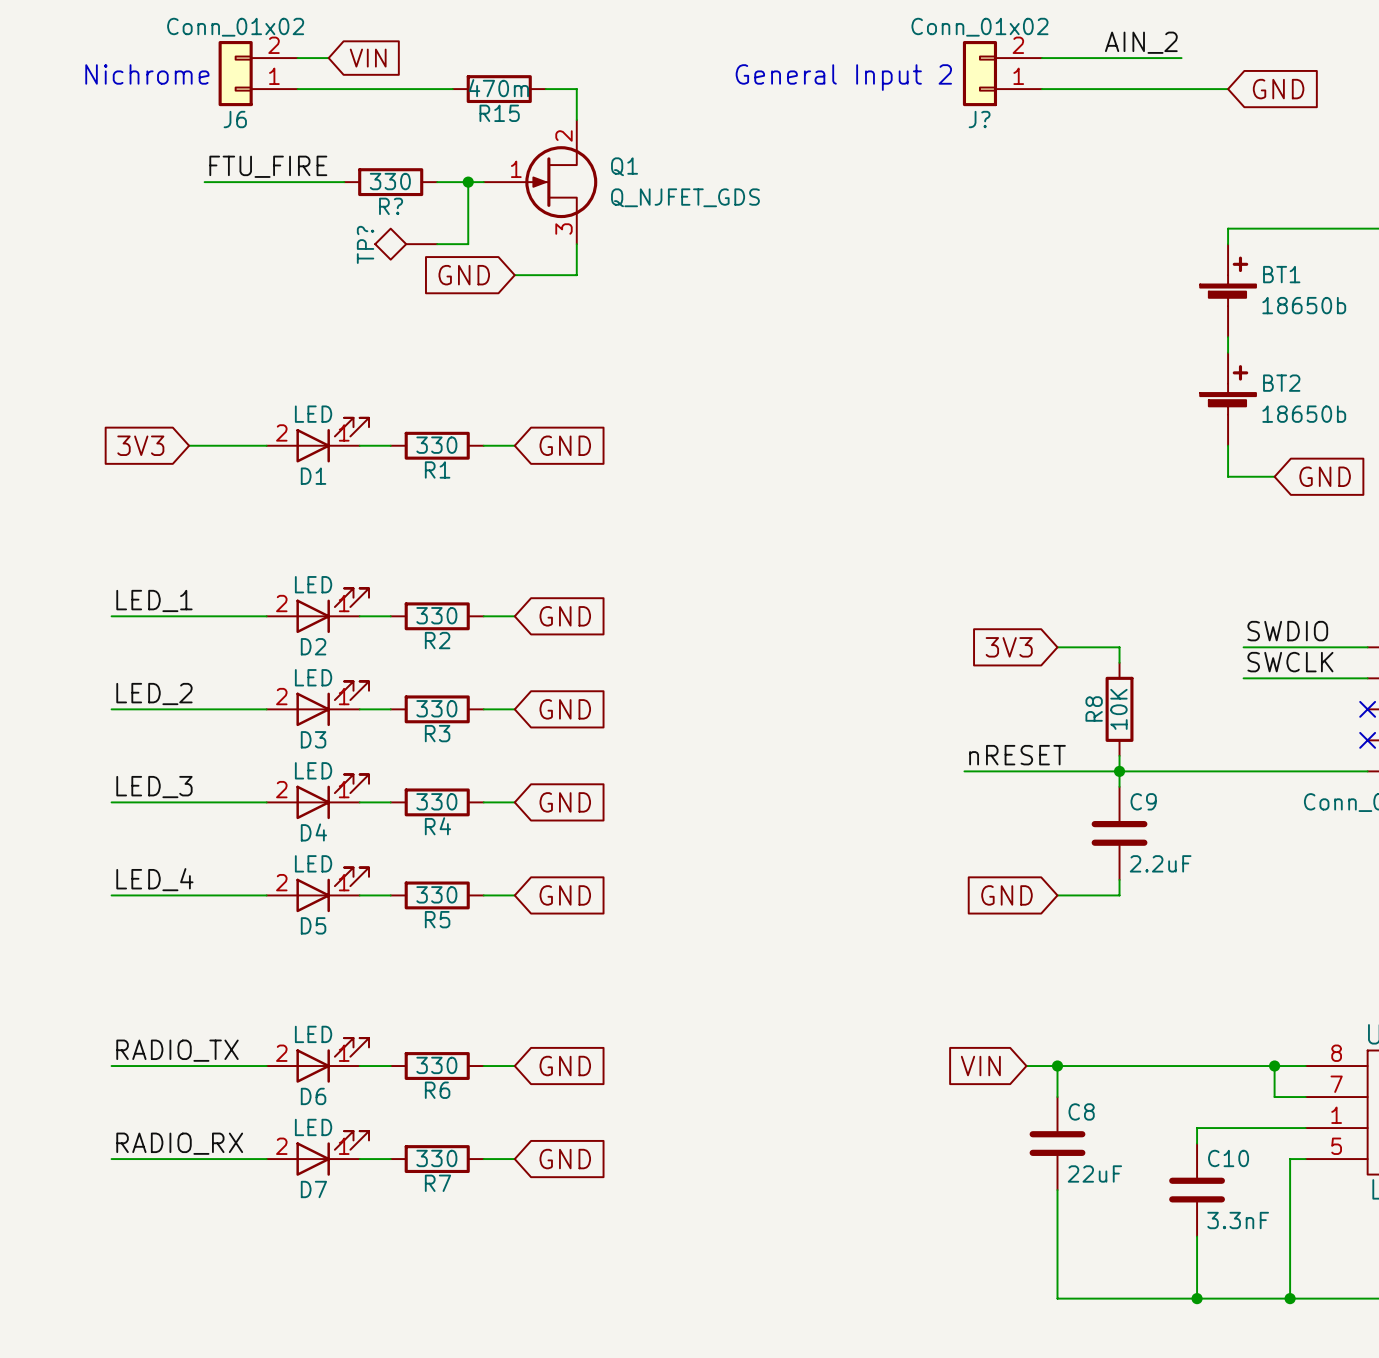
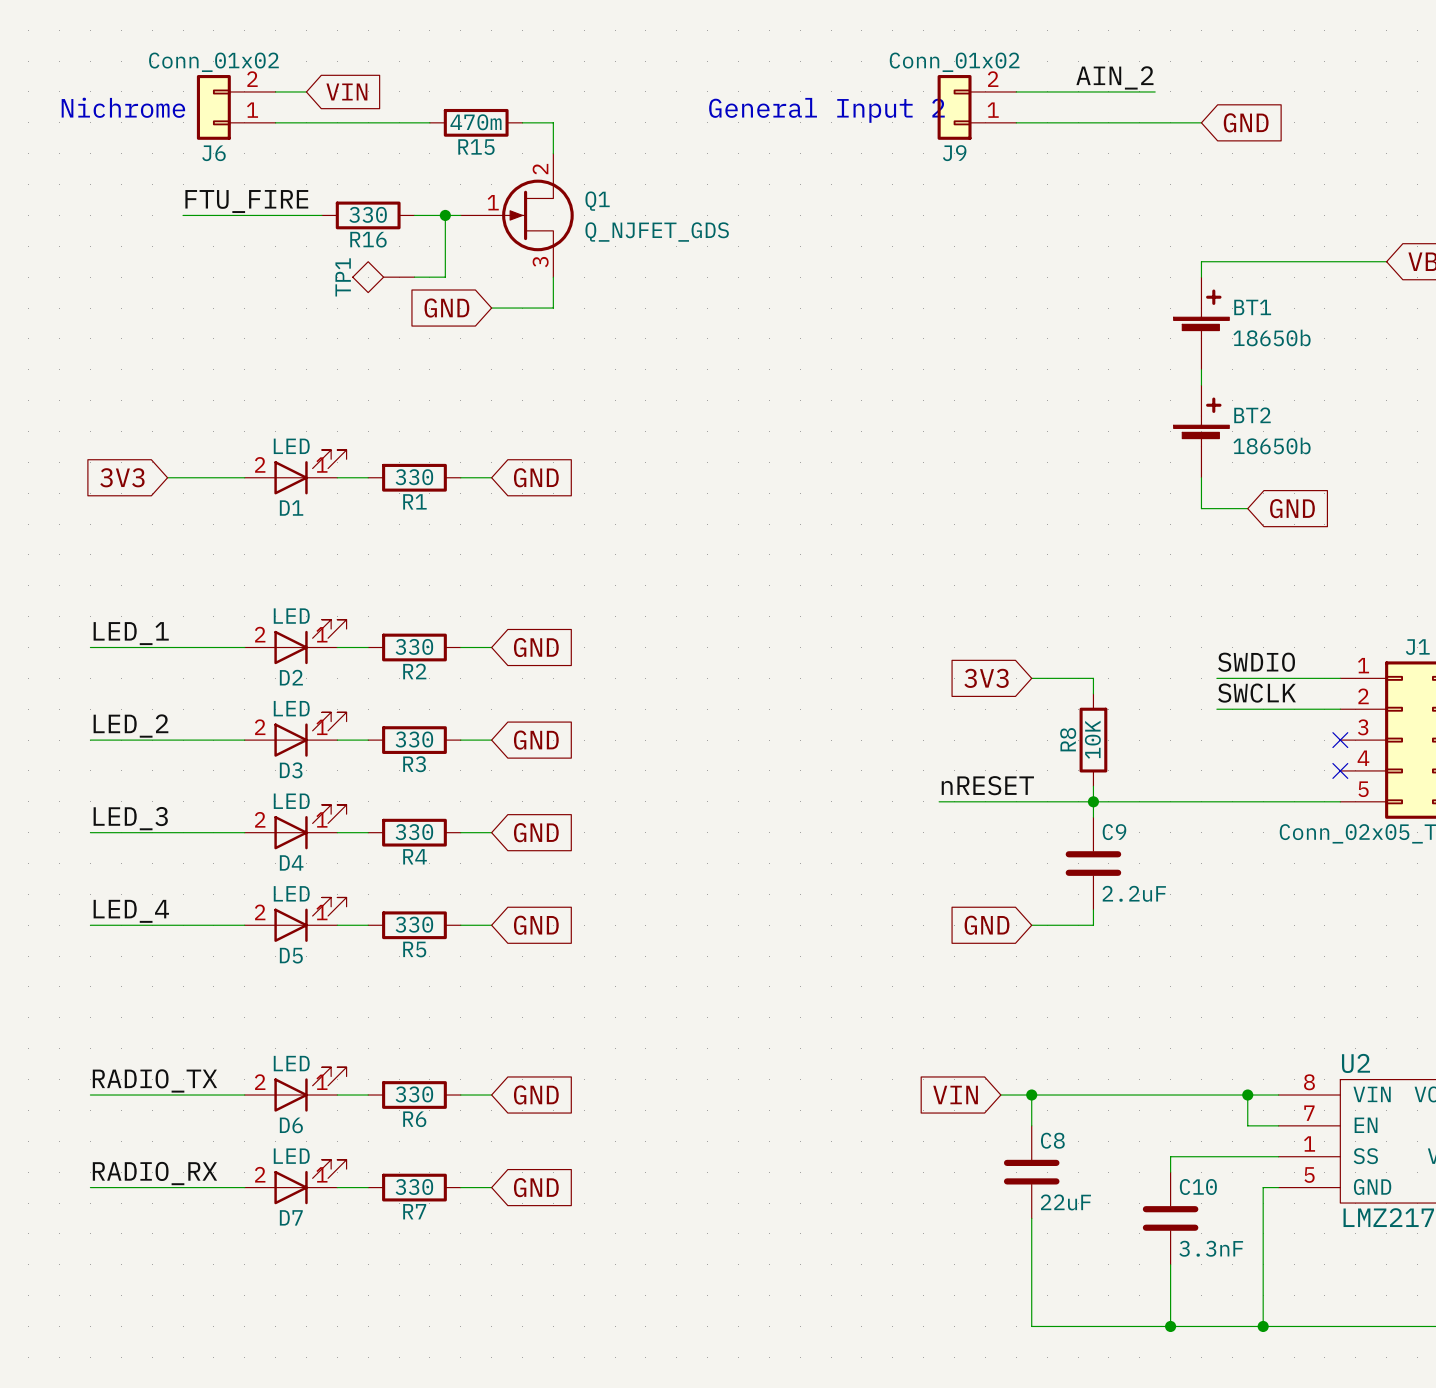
J? name: J? (979, 119) -> J9 (954, 153)
R? name: R? (391, 206) -> R16 (368, 239)
TP? name: TP? (365, 244) -> TP1 (343, 277)

